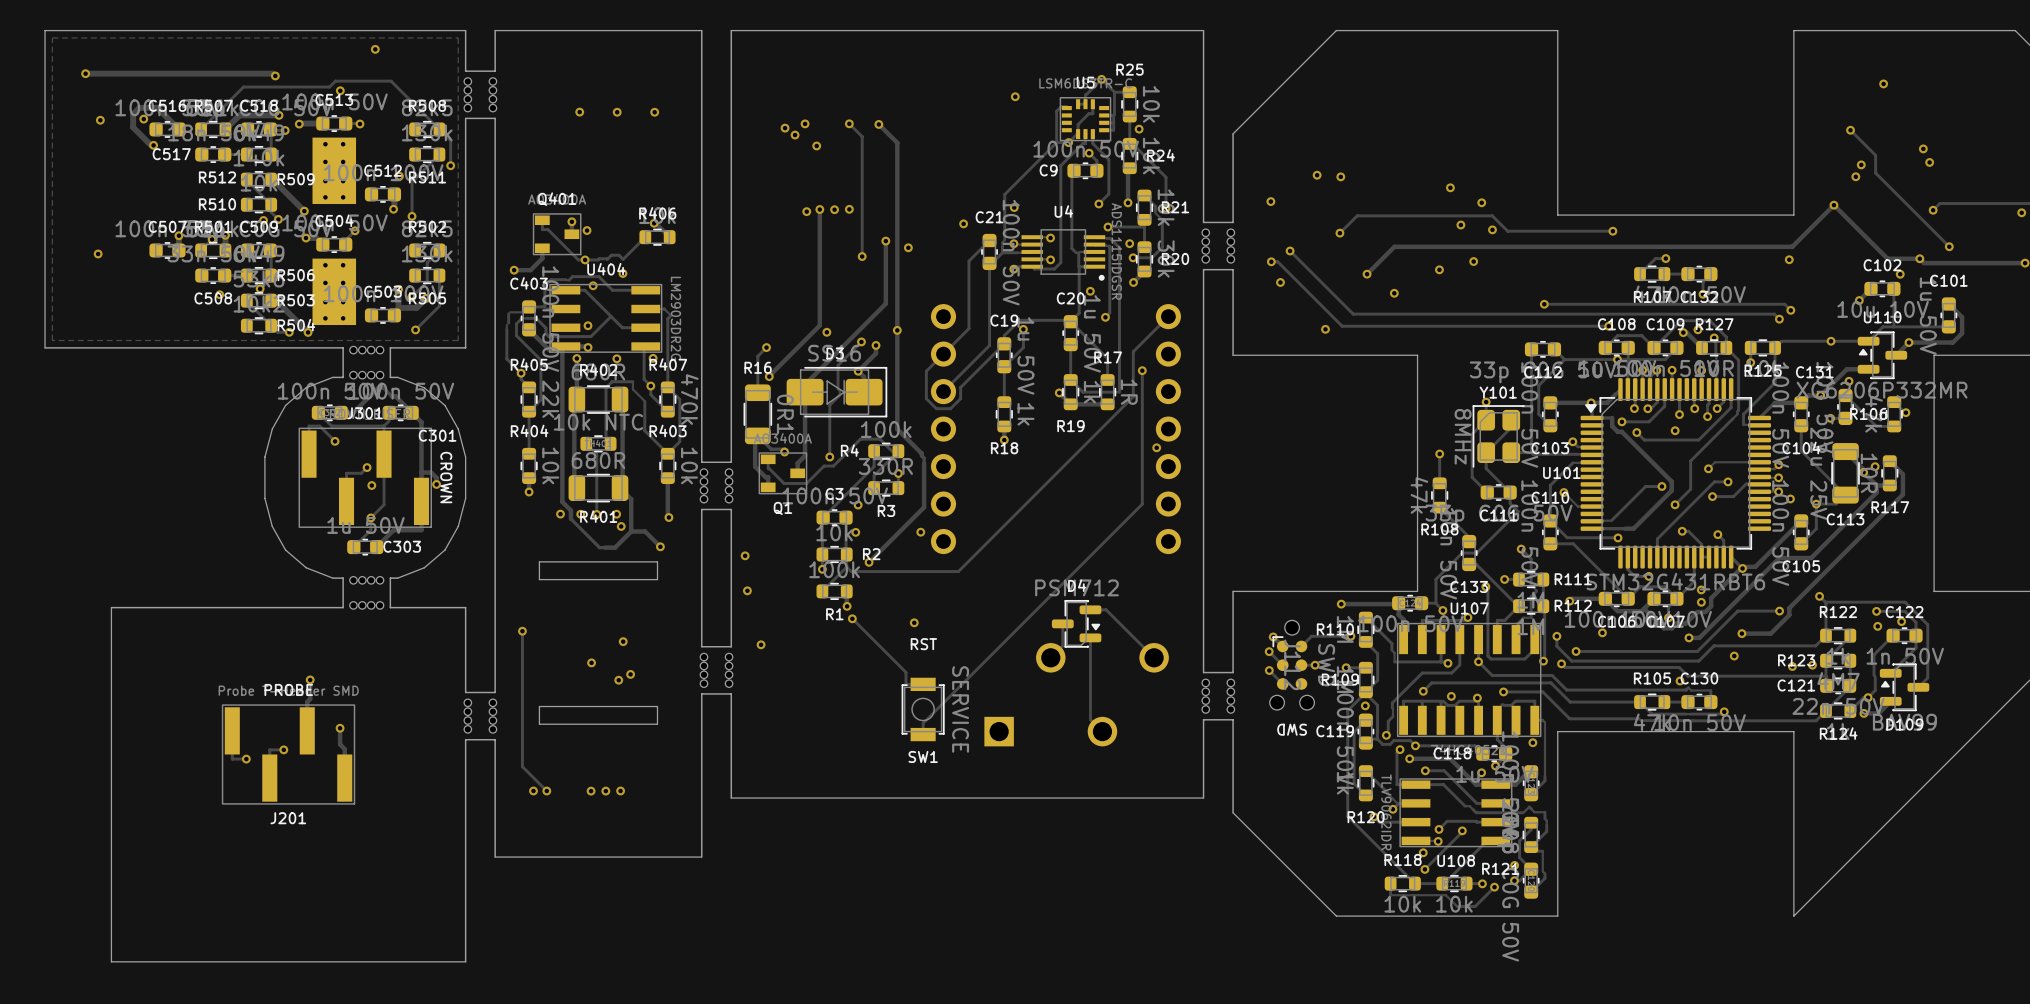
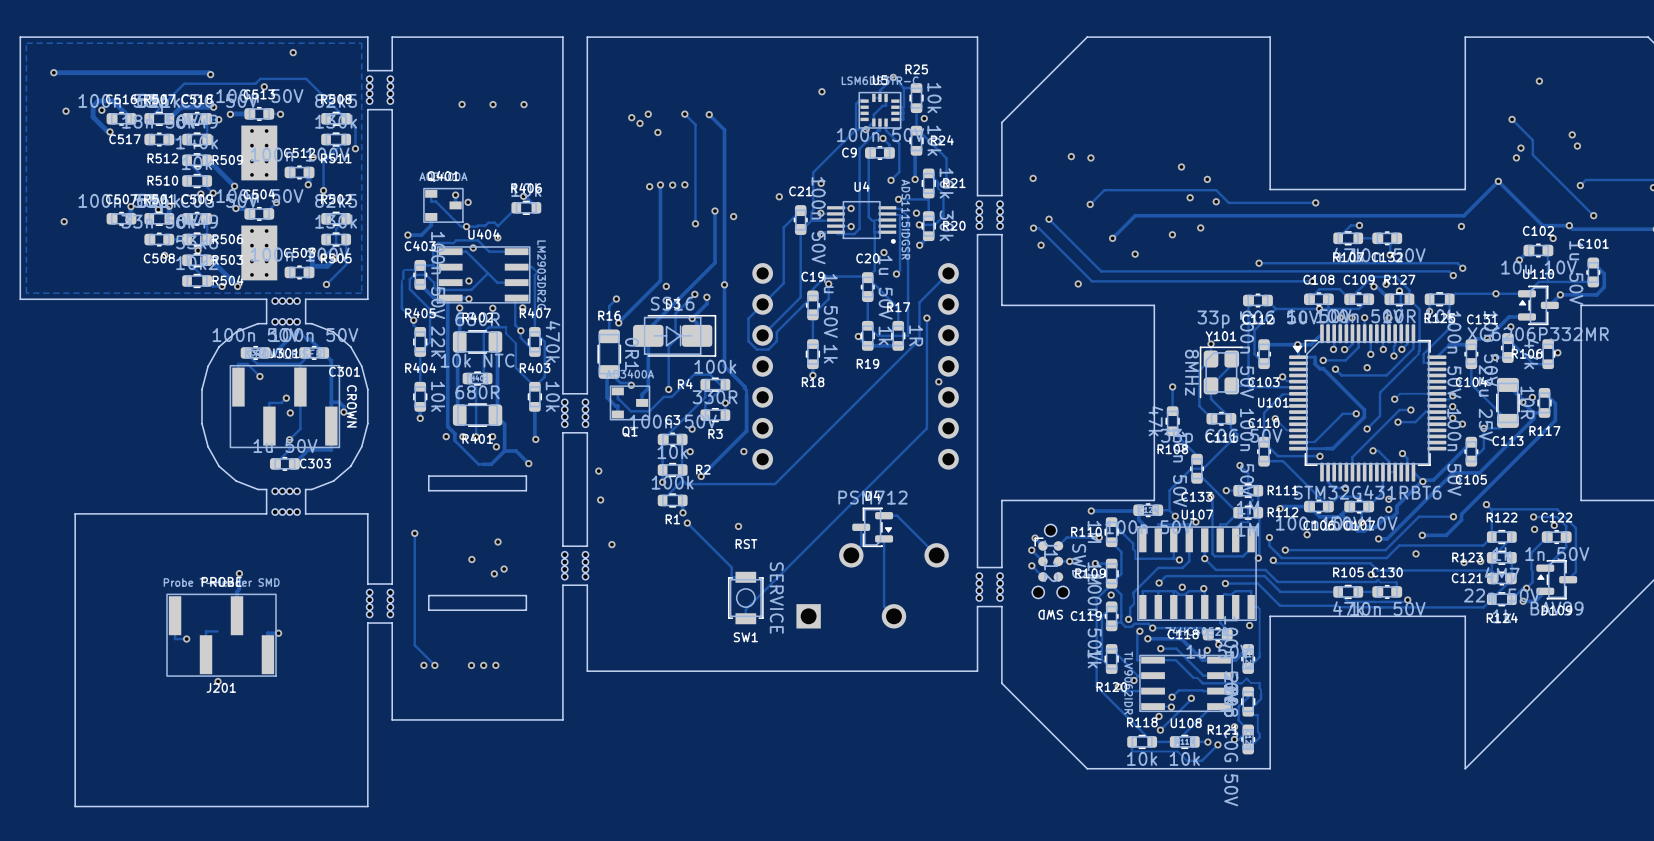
track: (340, 728) (340, 744) (344, 749) (344, 752) -> (278, 633) (267, 633)
via position: (340, 728) -> (278, 633)
via: (283, 749) -> none
via: none -> (218, 681)

